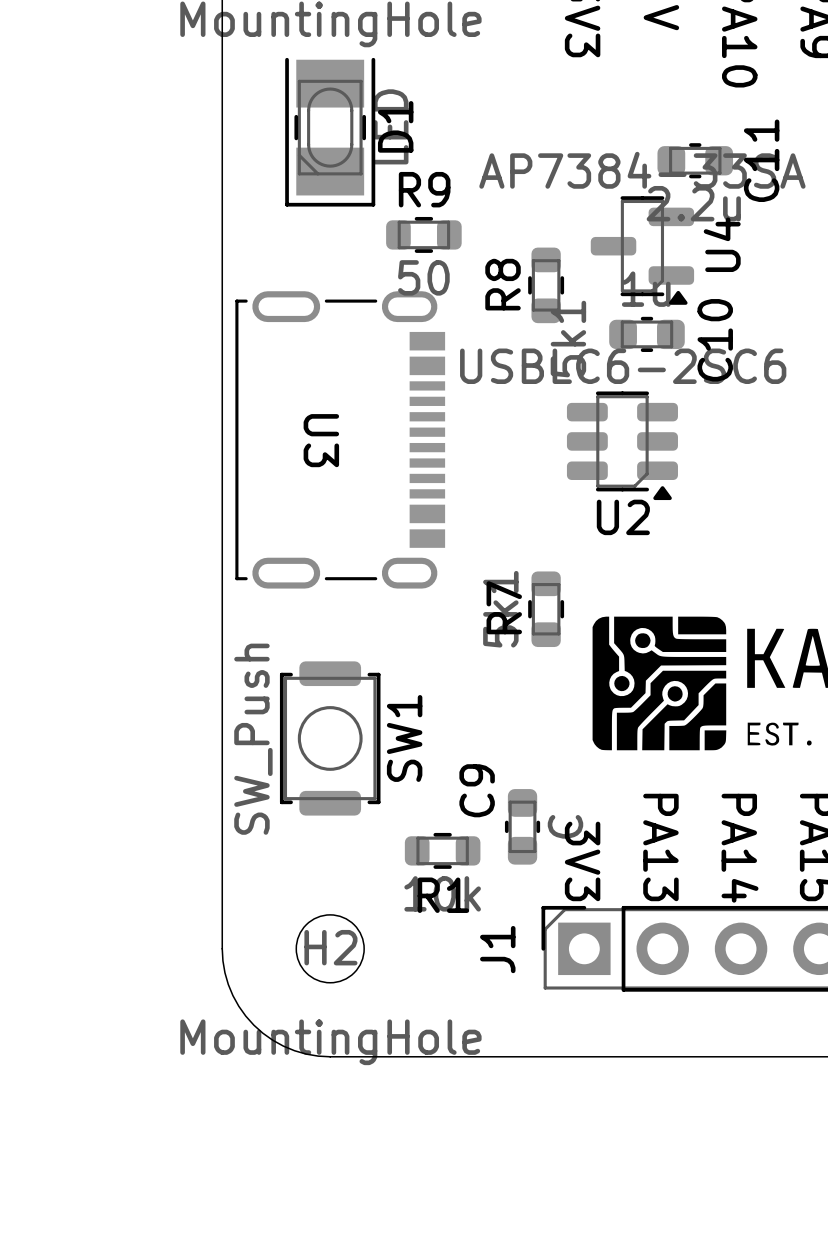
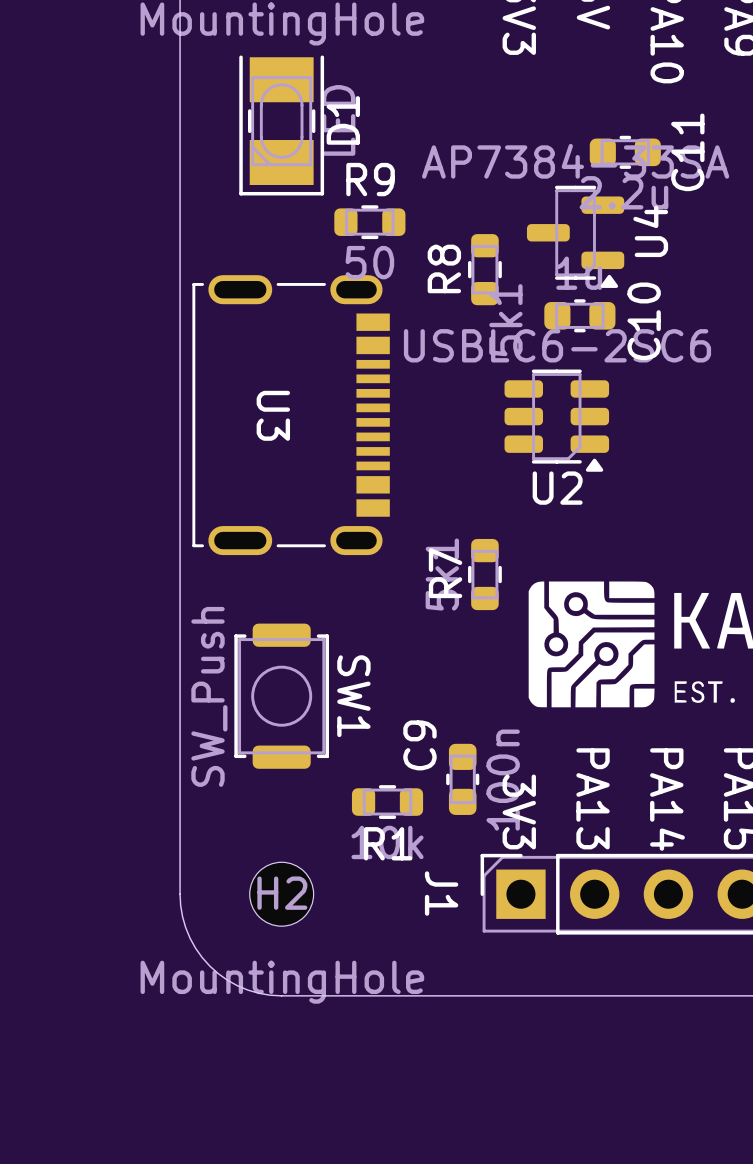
SW1 name rotation: 0° (404, 738) -> 180° (353, 696)
C9 value: C (565, 826) -> 100n (503, 780)
J1 name rotation: 0° (497, 949) -> 180° (441, 893)

